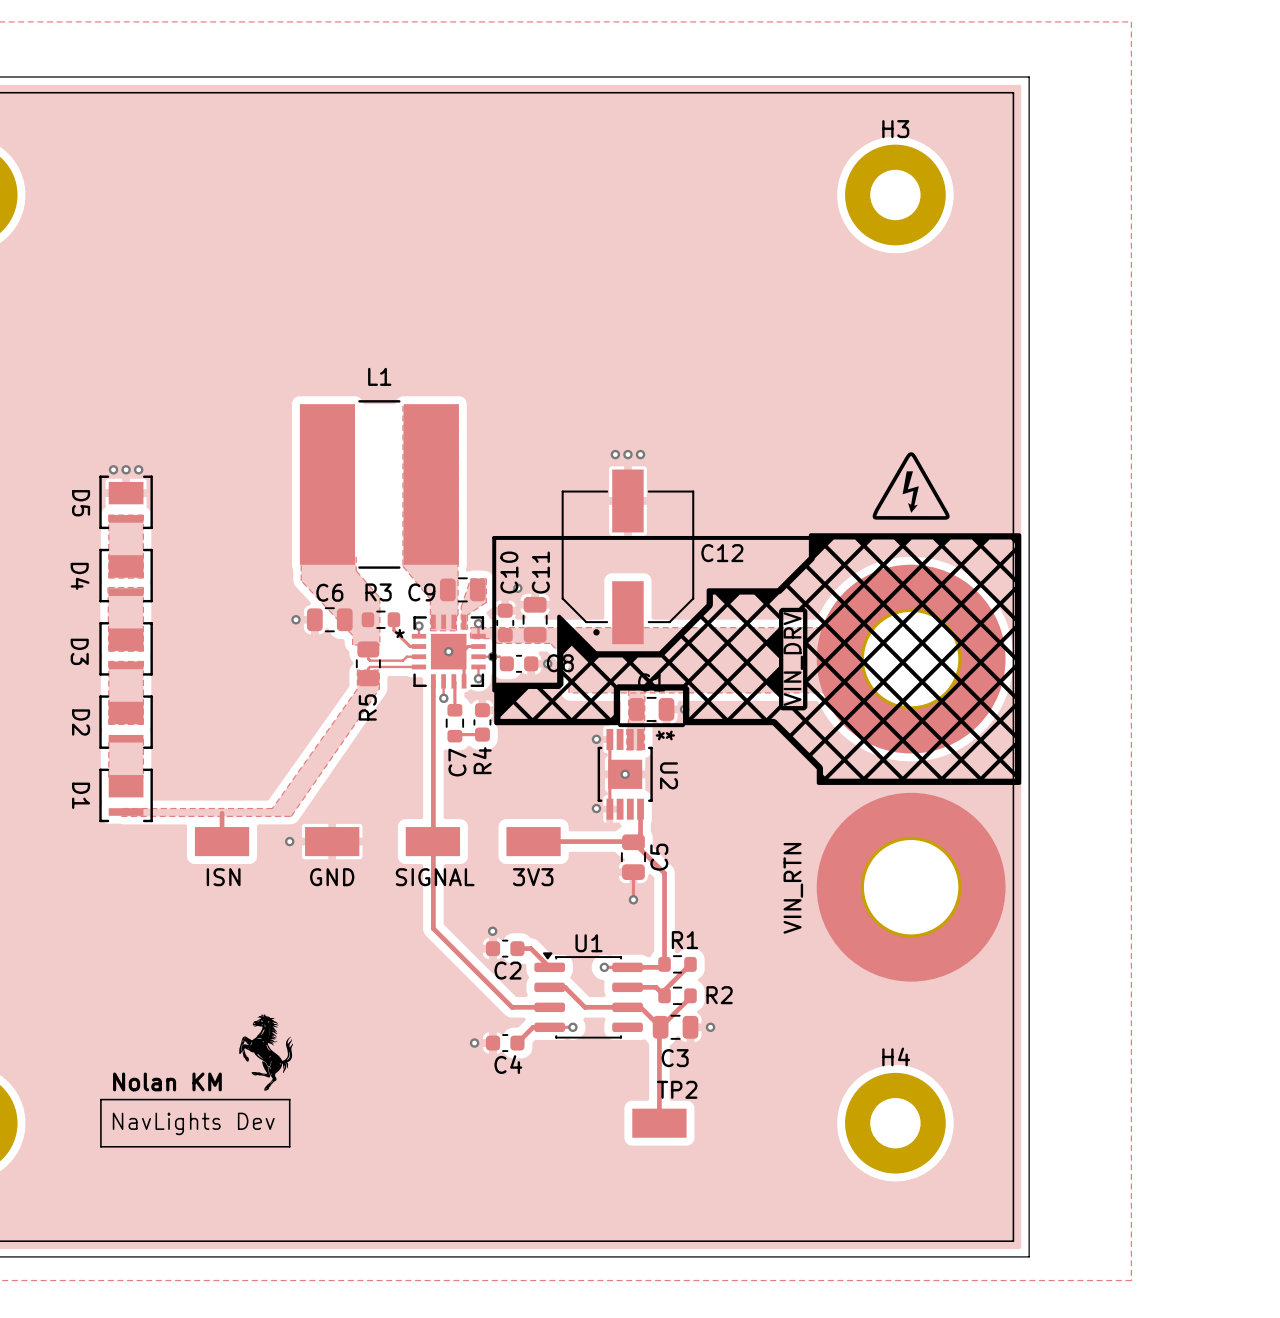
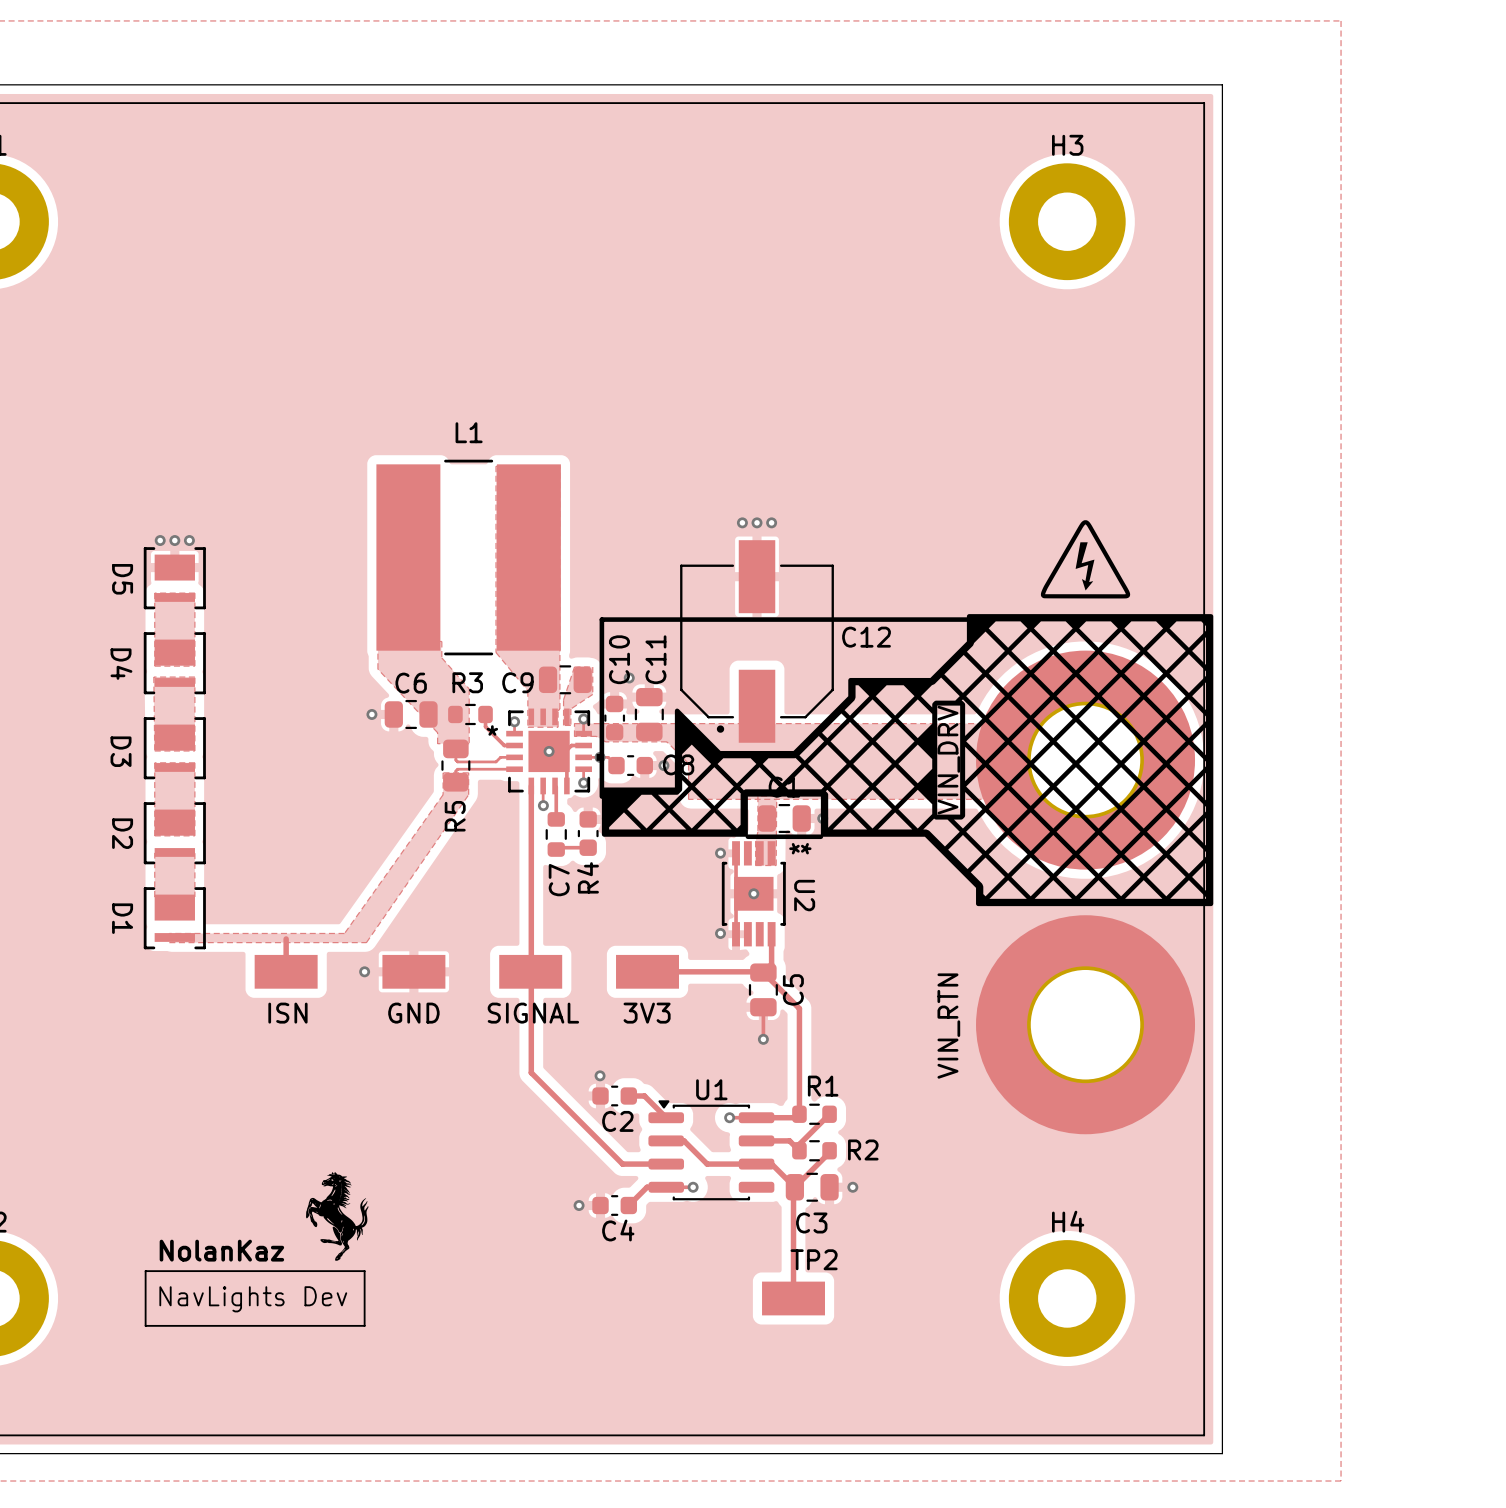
text: Nolan KM (167, 1081) -> NolanKaz (221, 1250)

